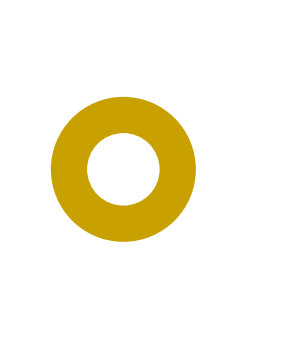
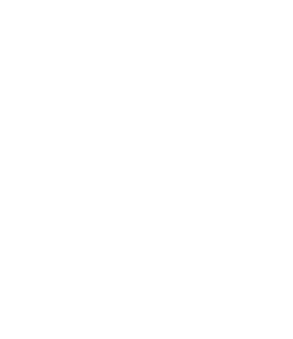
part: (123, 169) -> none

